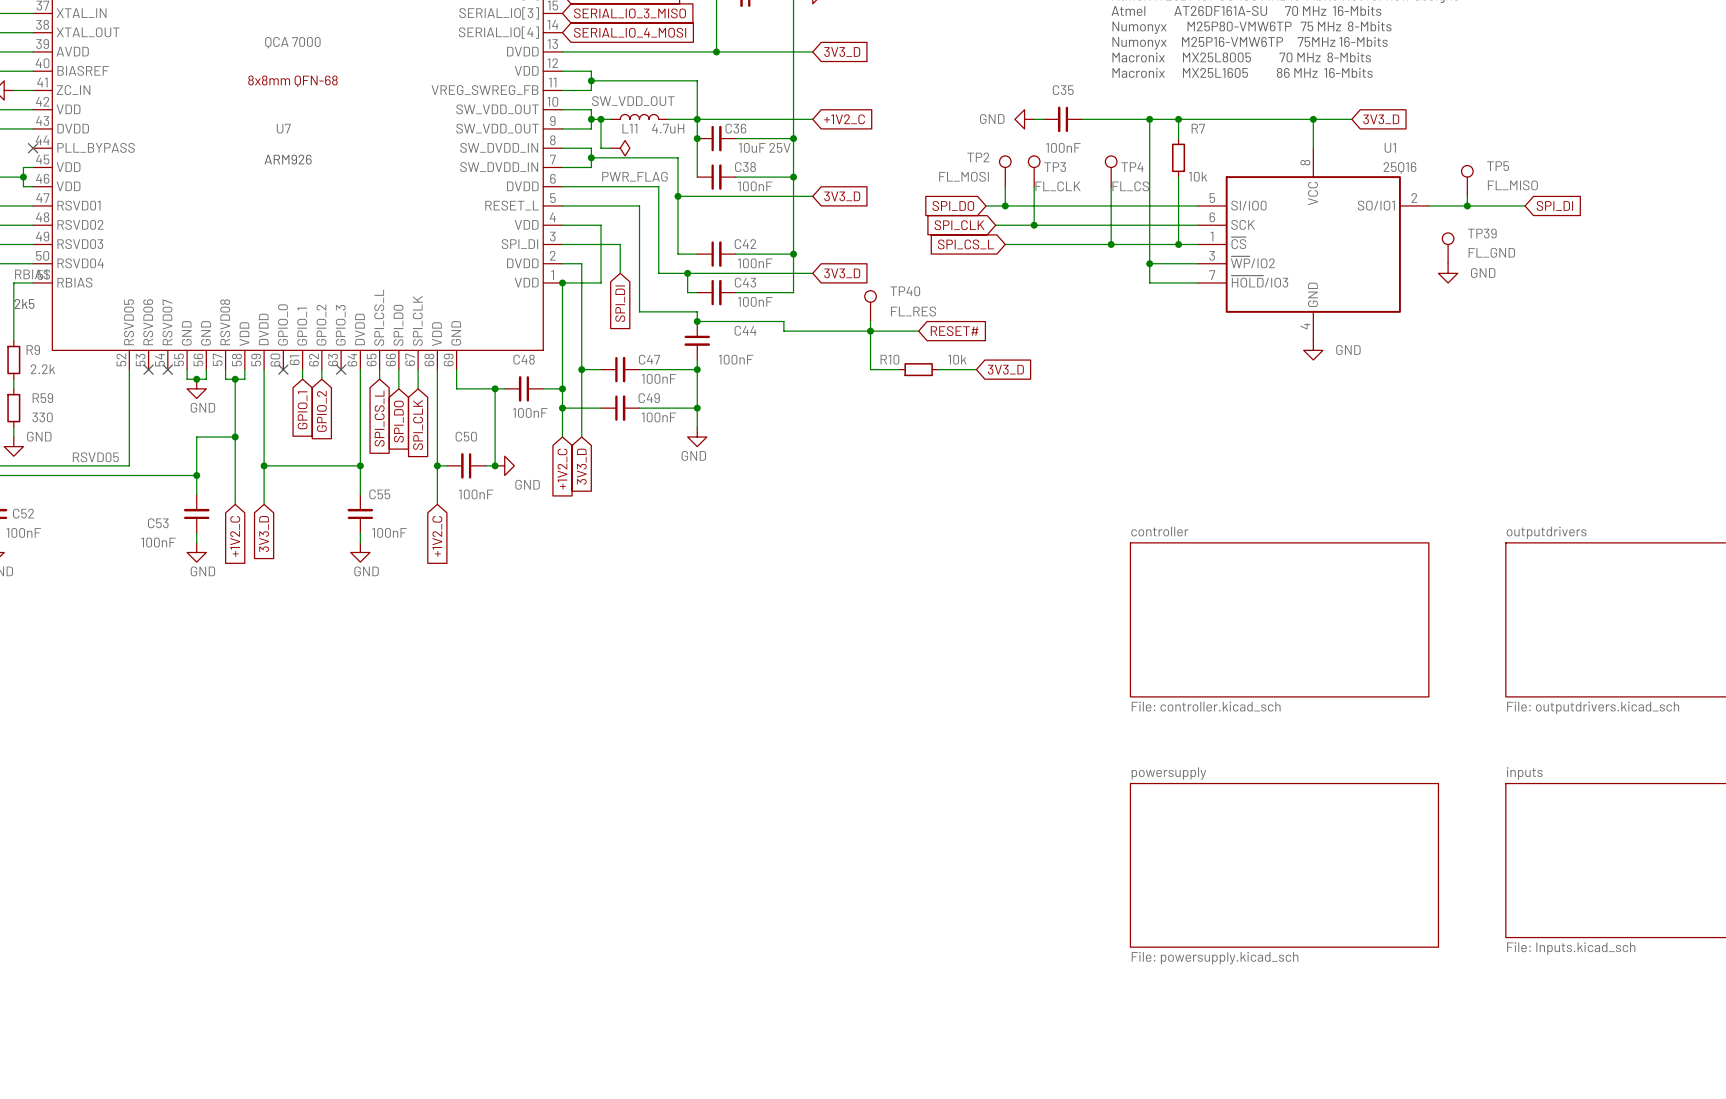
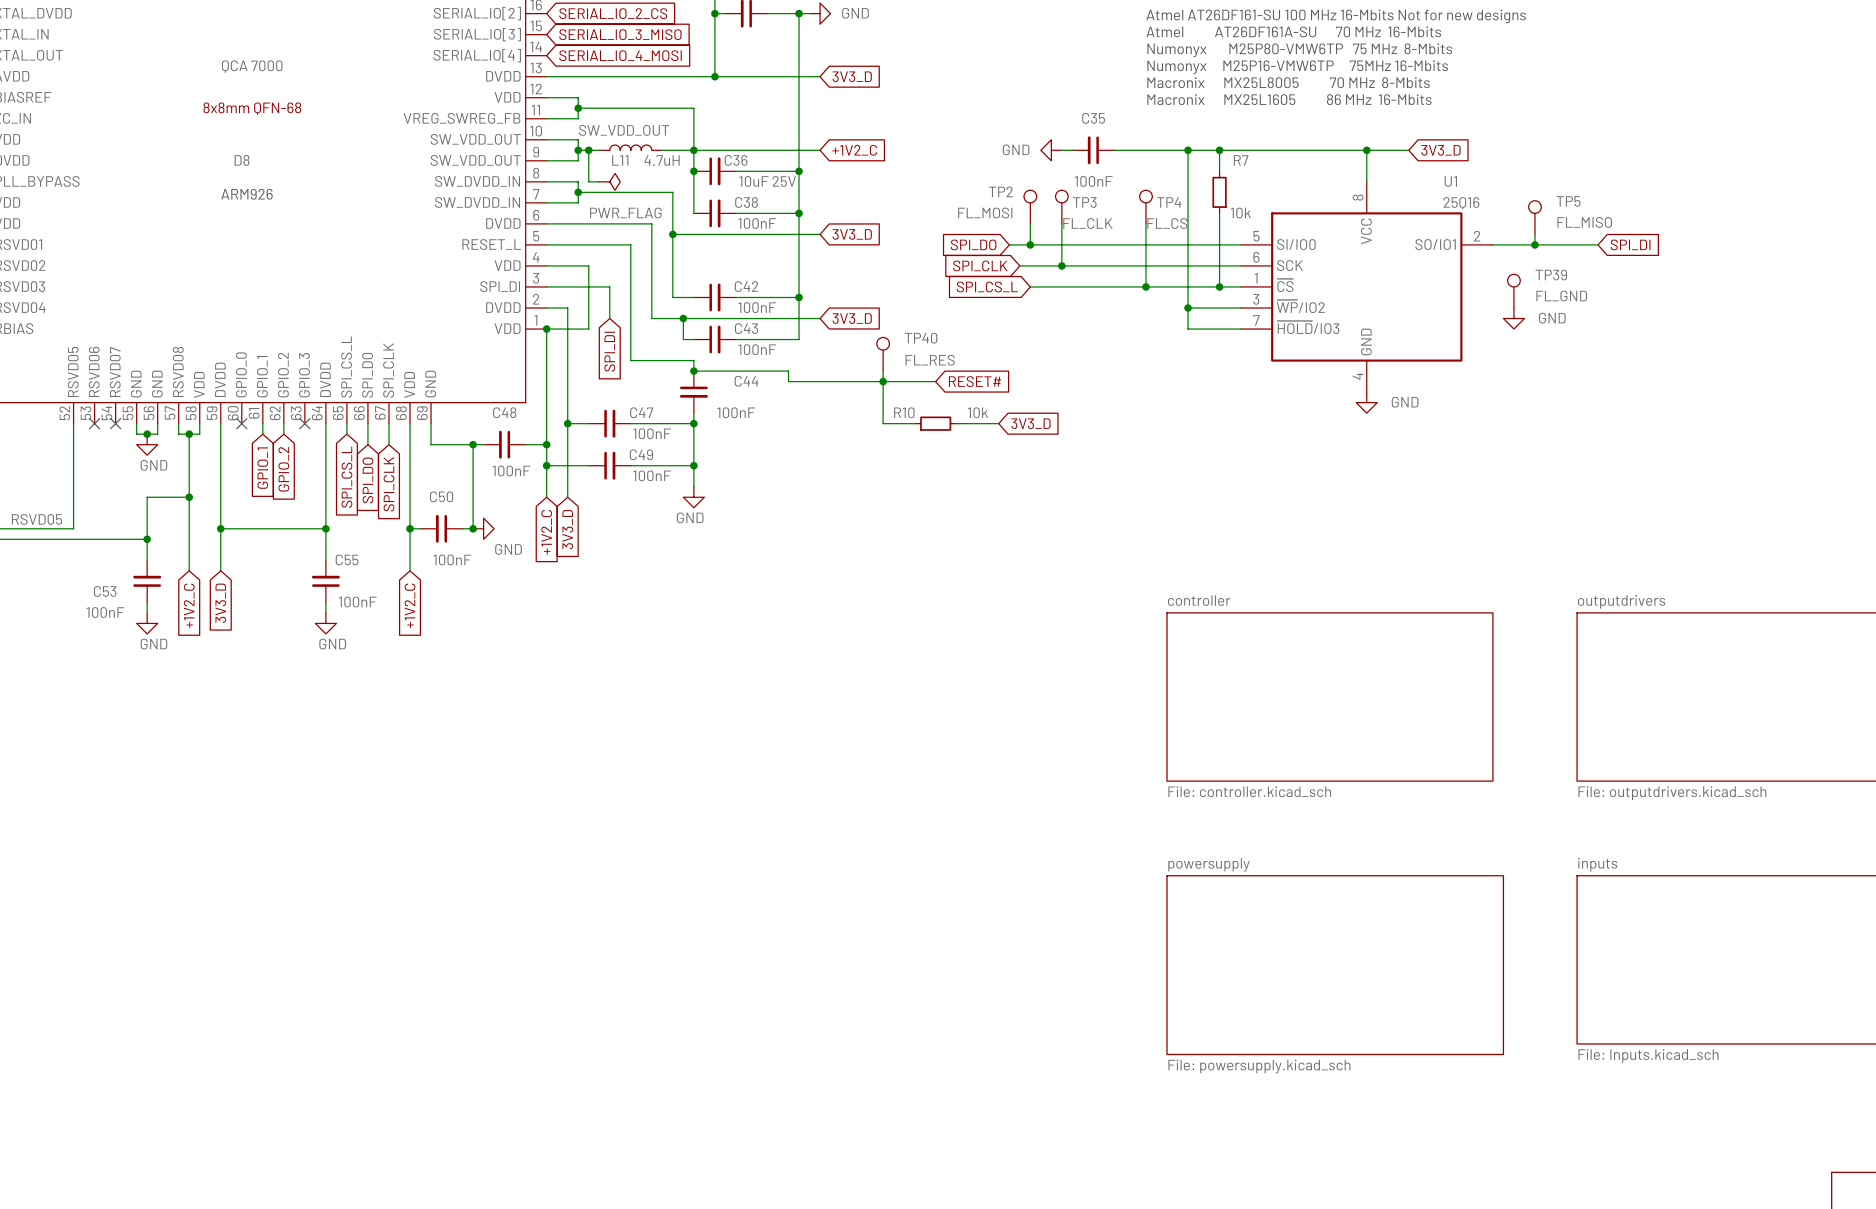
U7 name: U7 (283, 128) -> D8 (242, 160)

